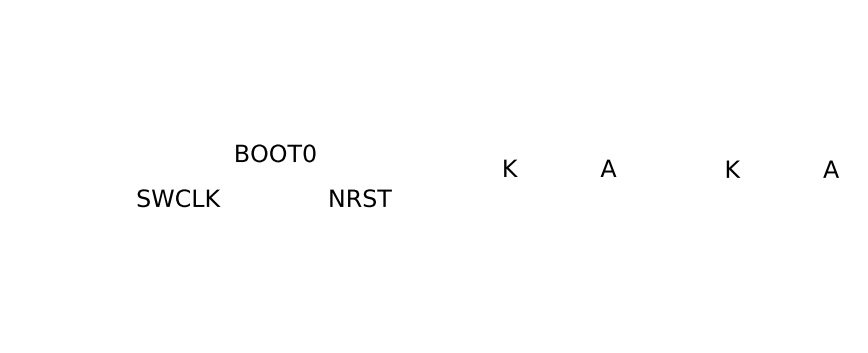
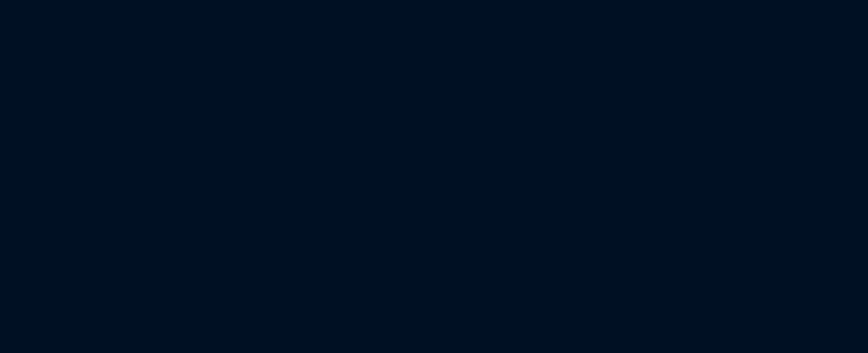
text: BOOT0 (275, 153) -> none
text: K (511, 168) -> none
text: A (608, 168) -> none
text: K (733, 169) -> none
text: A (831, 169) -> none
text: SWCLK (179, 198) -> none
text: NRST (361, 198) -> none

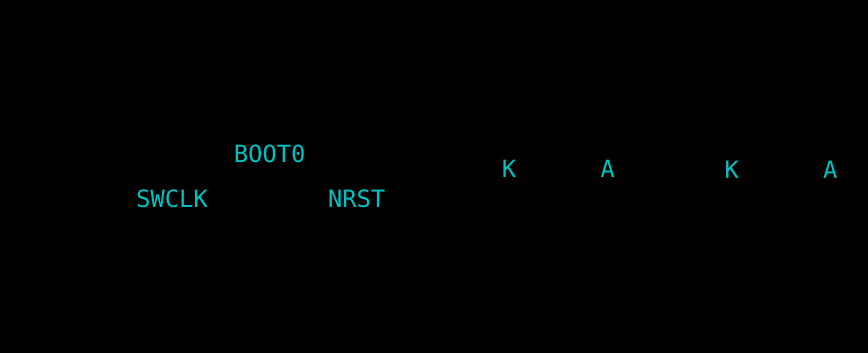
text: none -> BOOT0 (269, 153)
text: none -> K (509, 168)
text: none -> A (607, 168)
text: none -> K (732, 169)
text: none -> A (830, 169)
text: none -> SWCLK (172, 198)
text: none -> NRST (357, 198)

